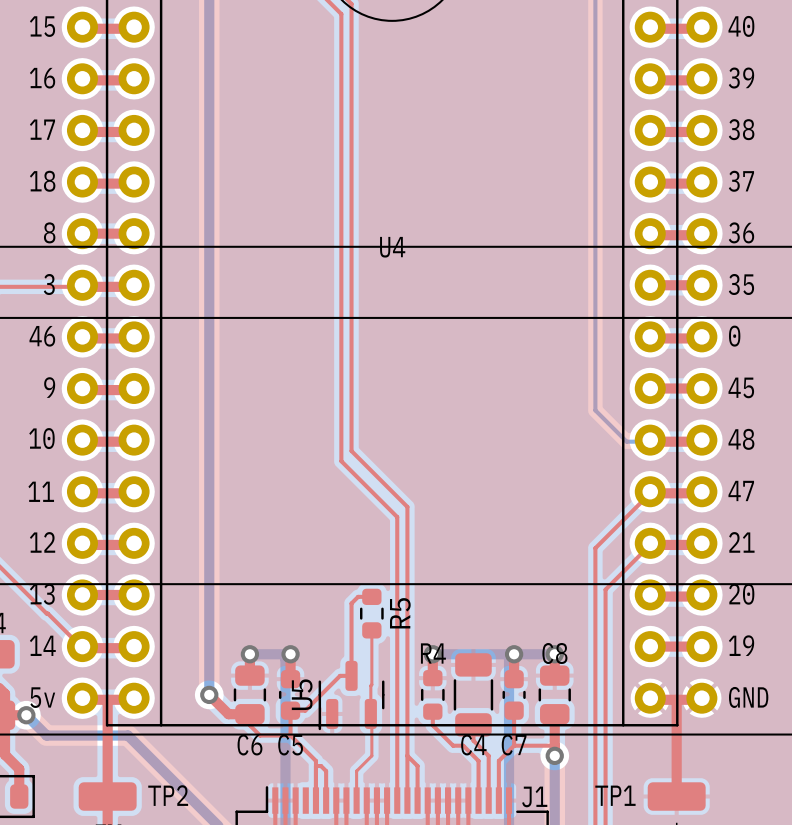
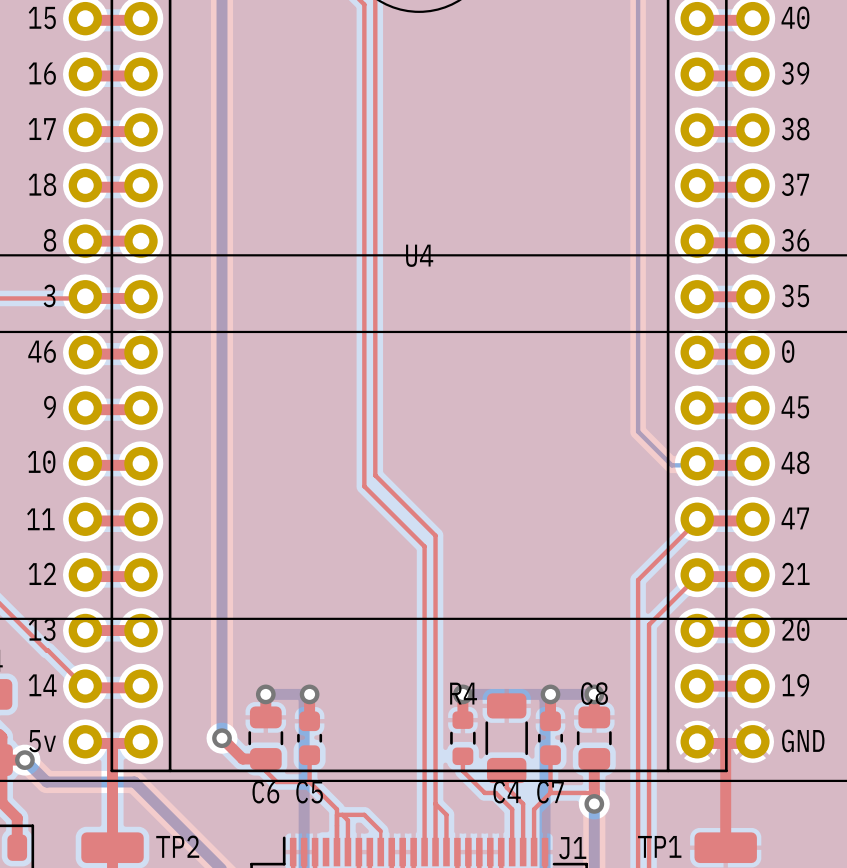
top track: (371, 596) (358, 596) (351, 603) (351, 675) (340, 675) (305, 710) (290, 710) -> none
R5: (371, 613) -> none
top track: (371, 630) (371, 755) (356, 771) (356, 781) -> (342, 814) (364, 814) (380, 831)
U5: (351, 695) -> none

